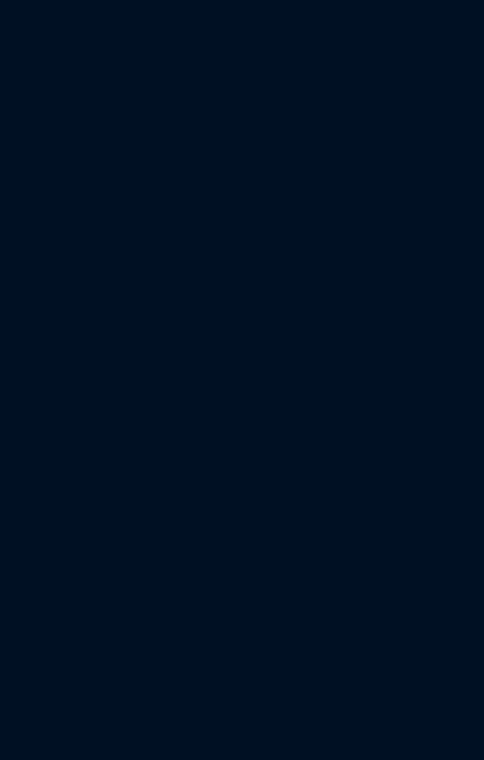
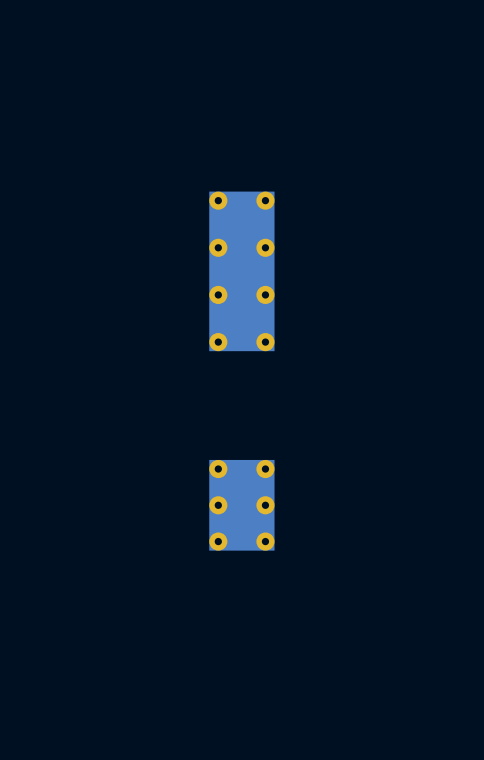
part: none -> (241, 271)
part: none -> (241, 505)

